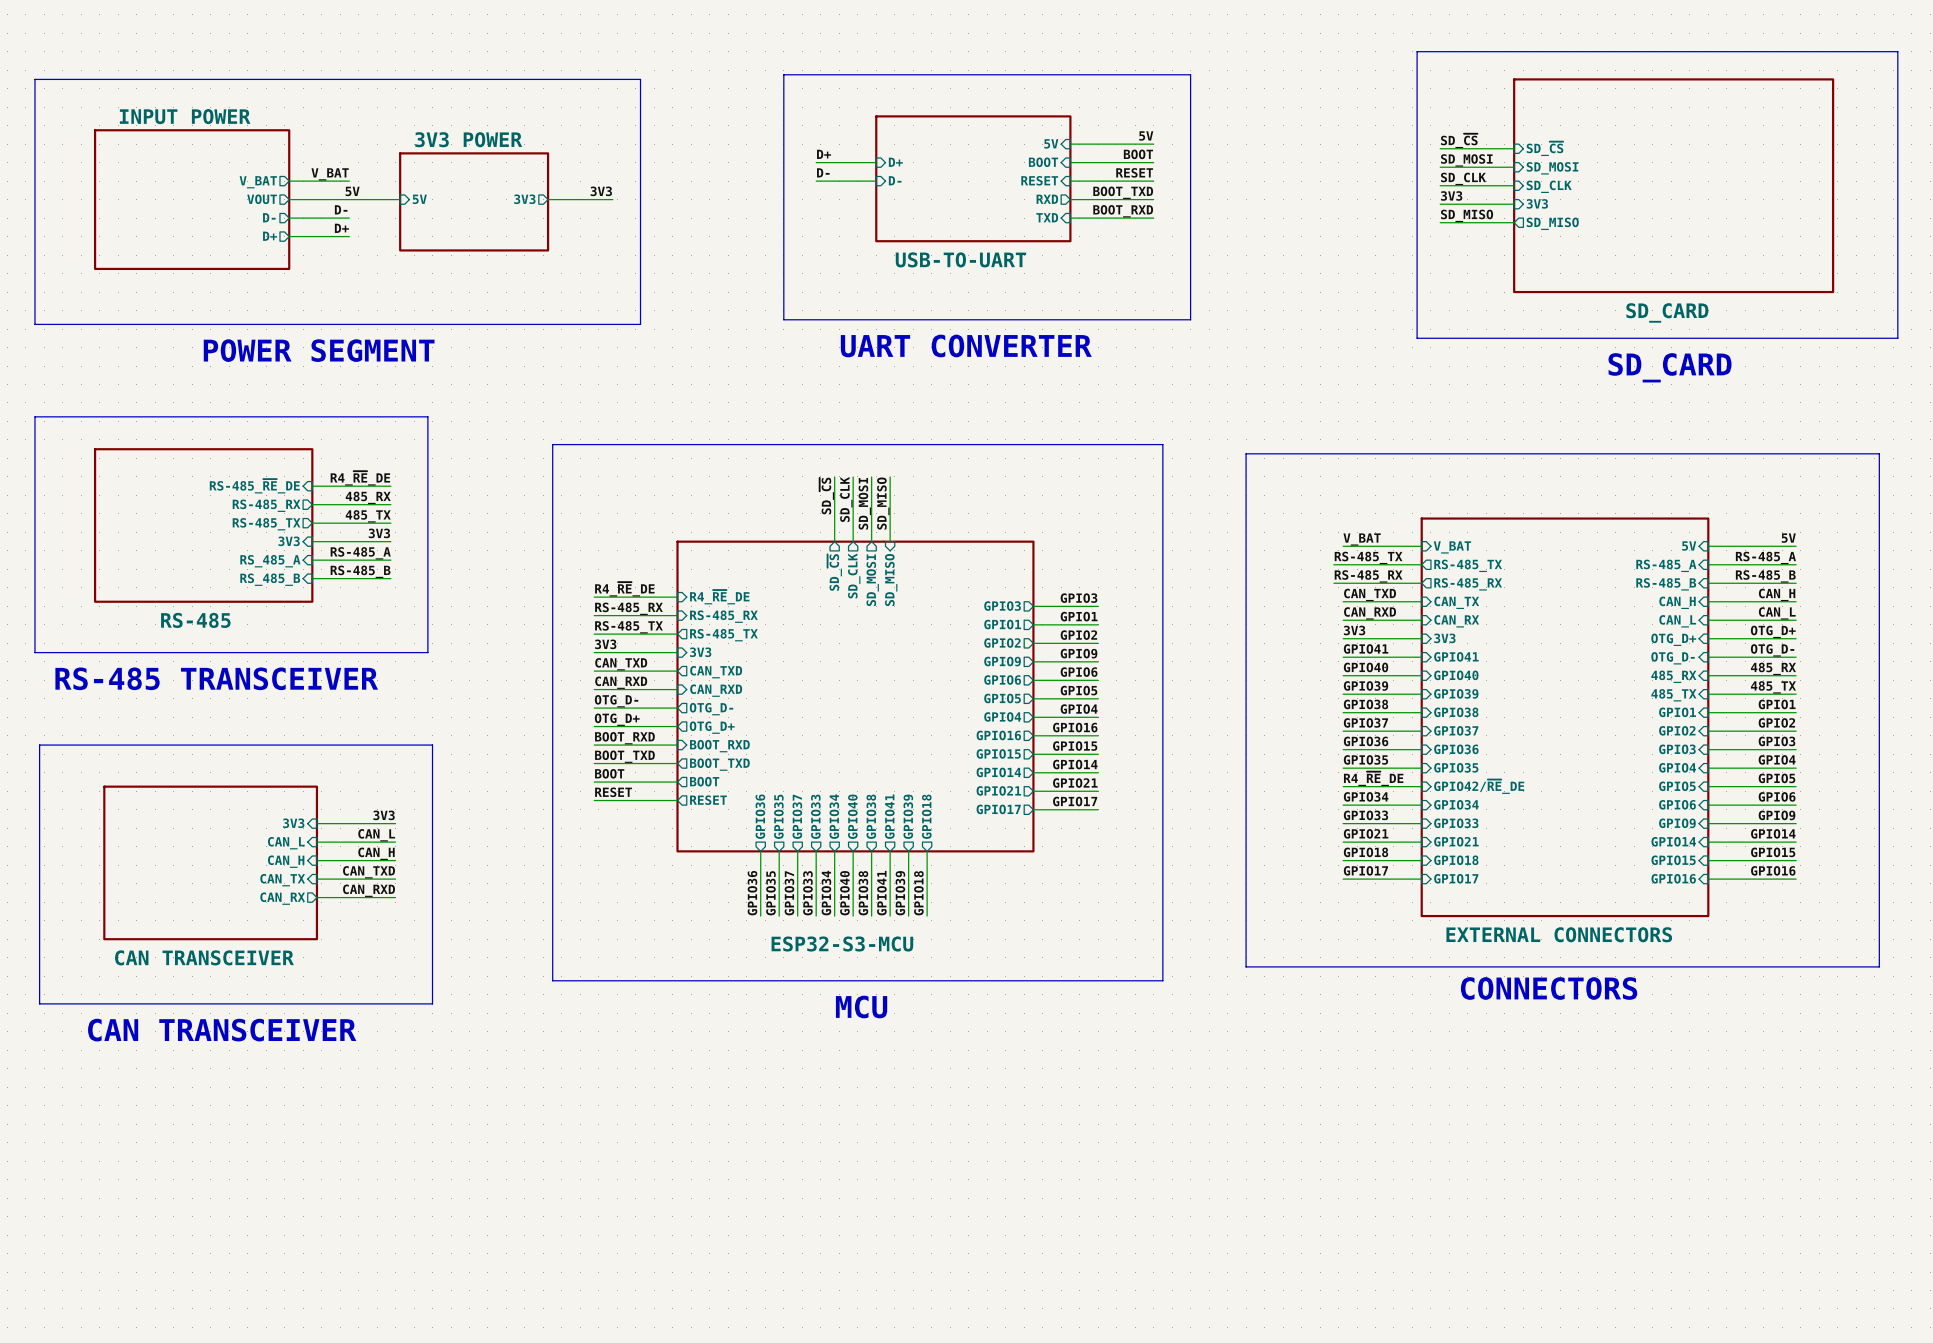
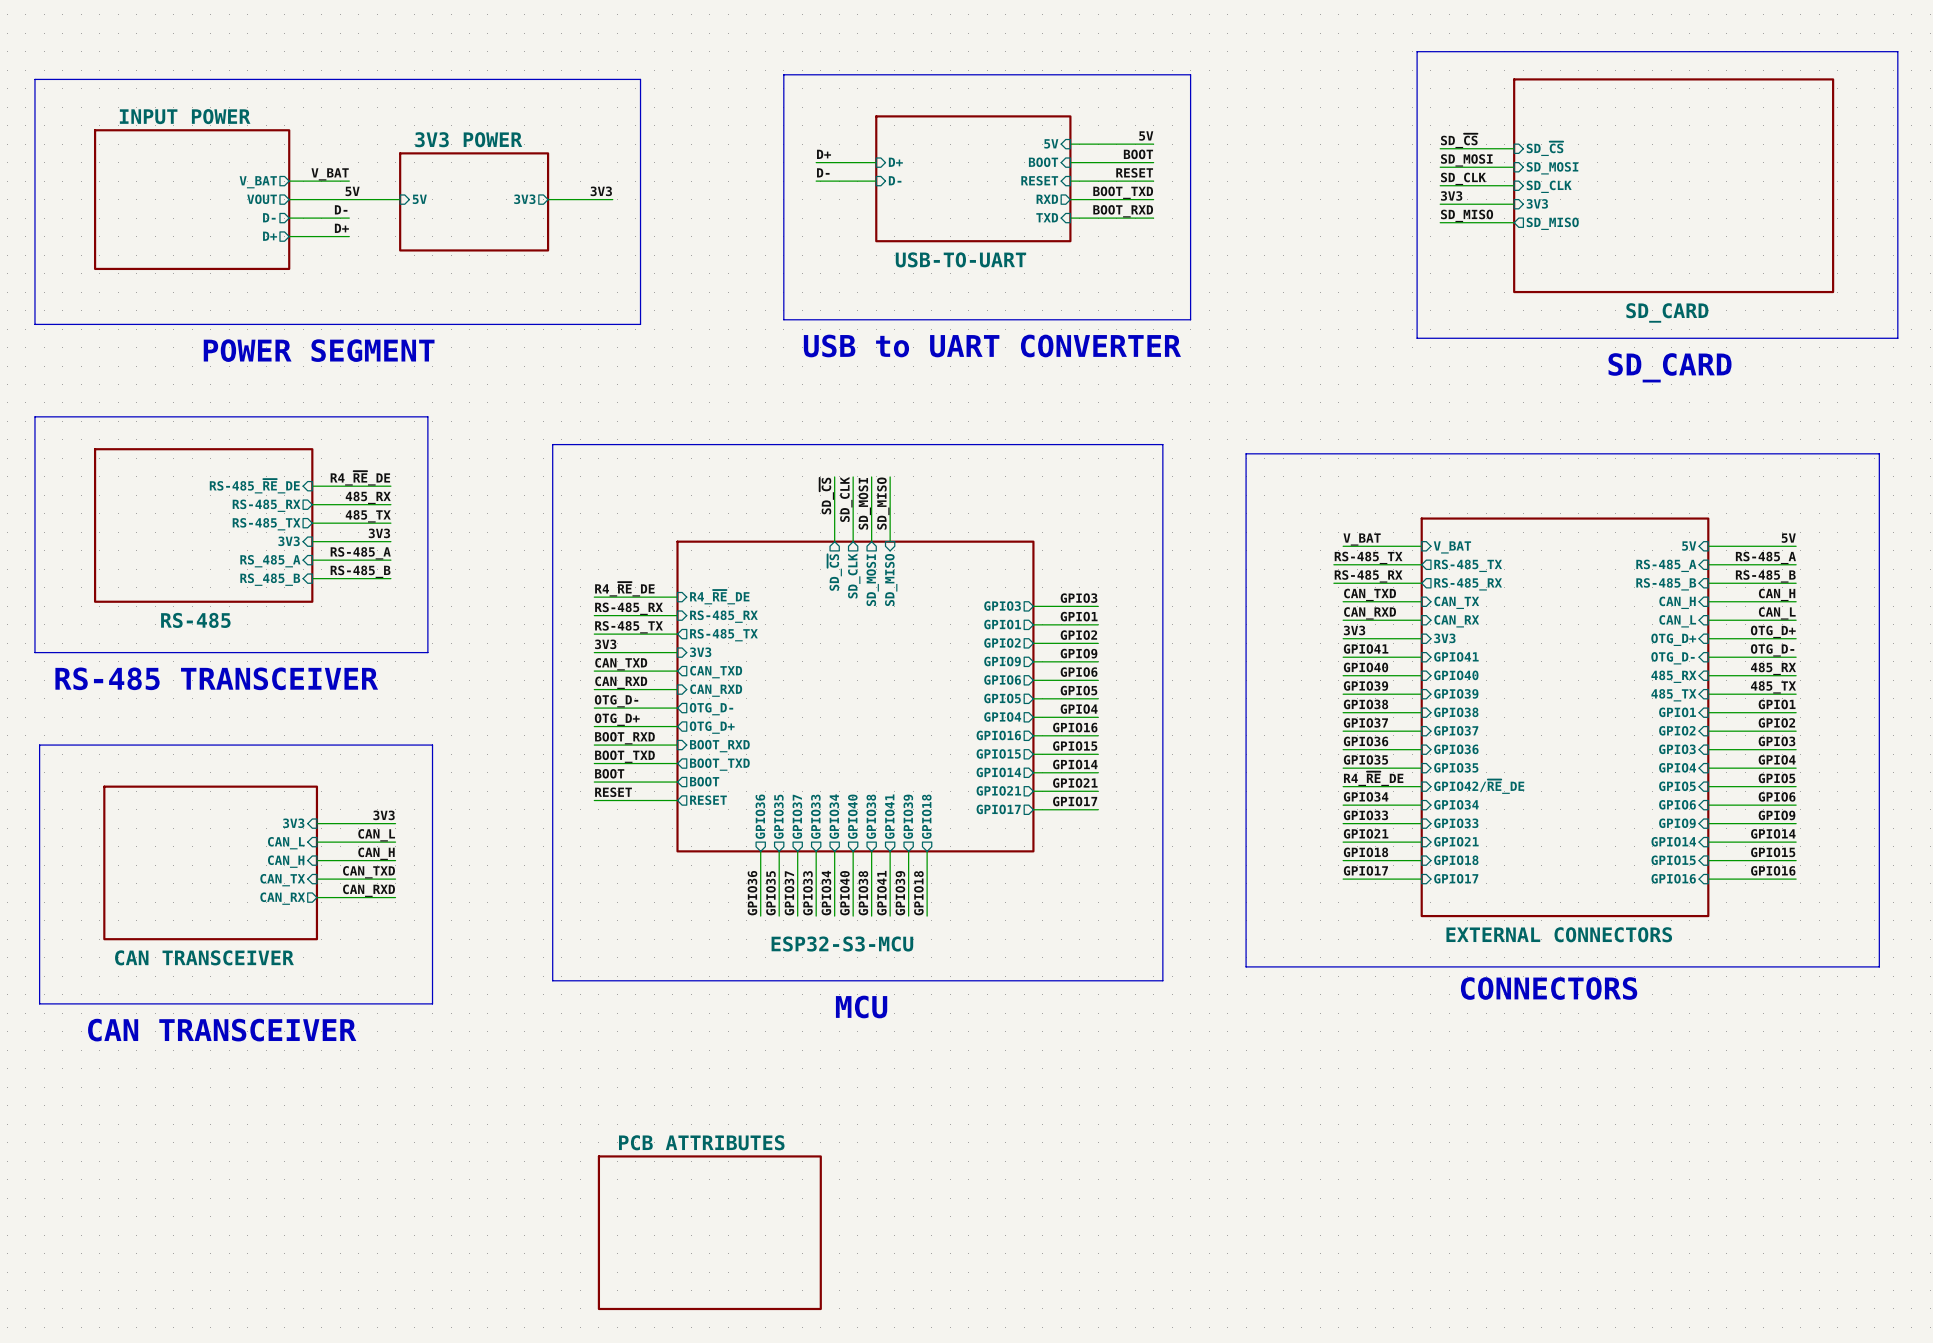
text: UART CONVERTER (966, 345) -> USB to UART CONVERTER (992, 345)
sheet PCB ATTRIBUTES: none -> (709, 1232)

